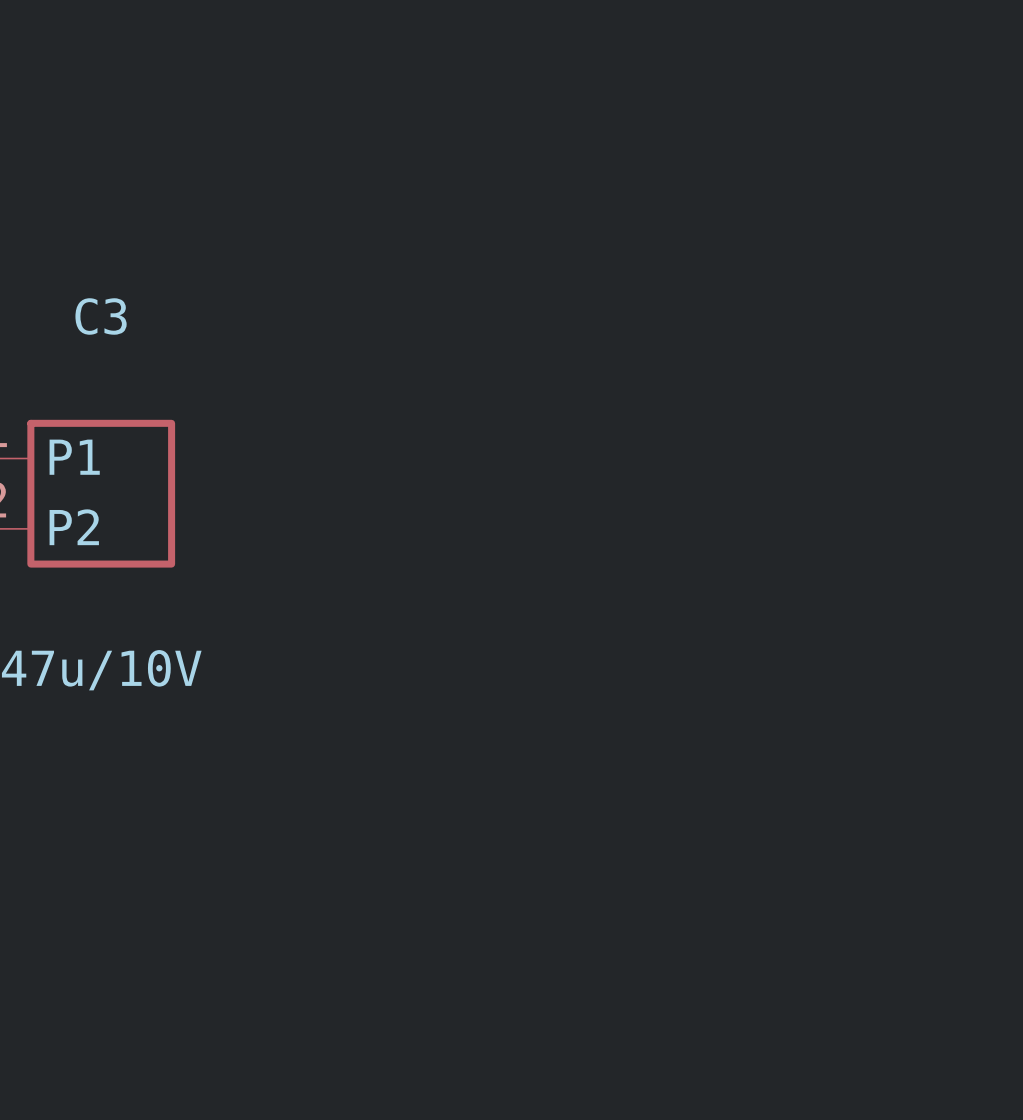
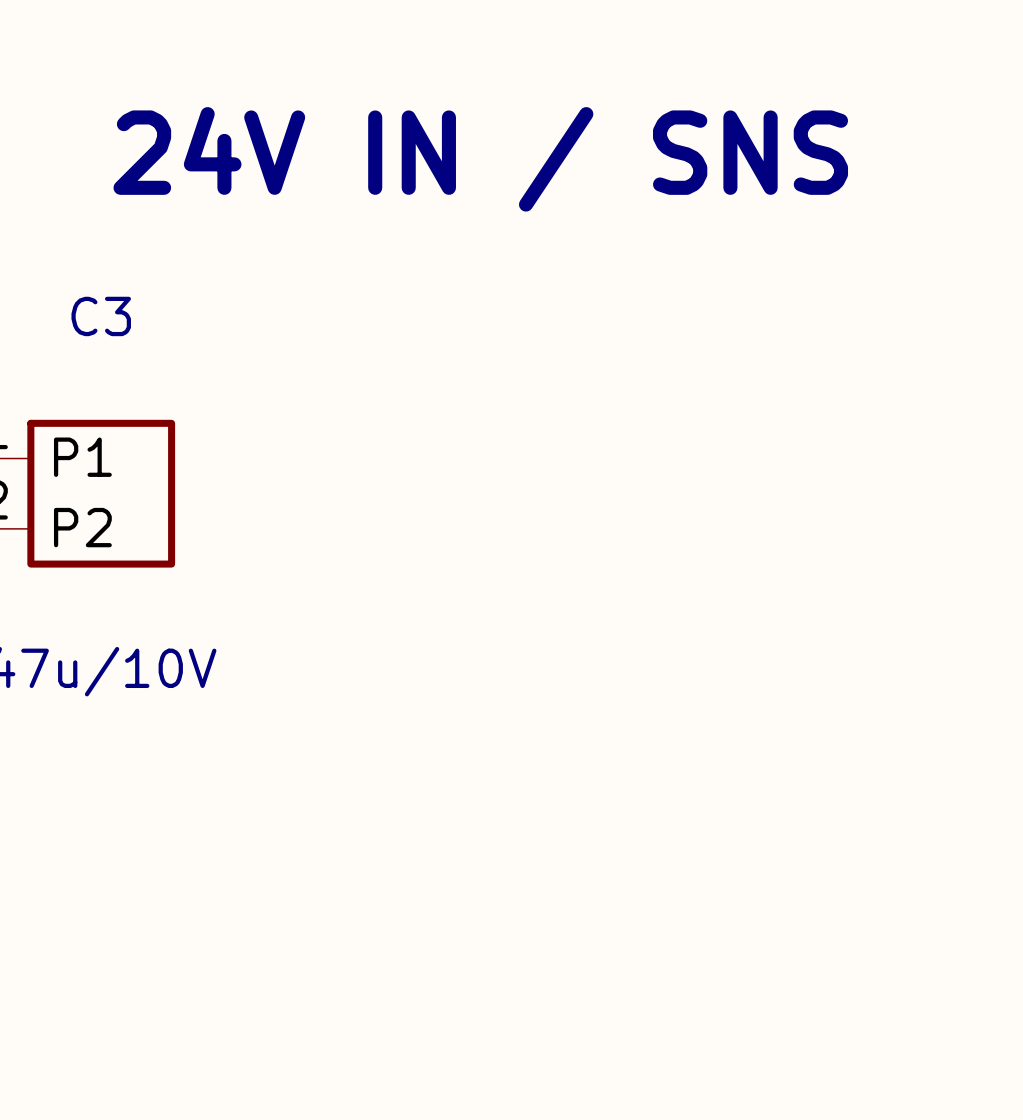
text: none -> 24V IN / SNS (480, 159)

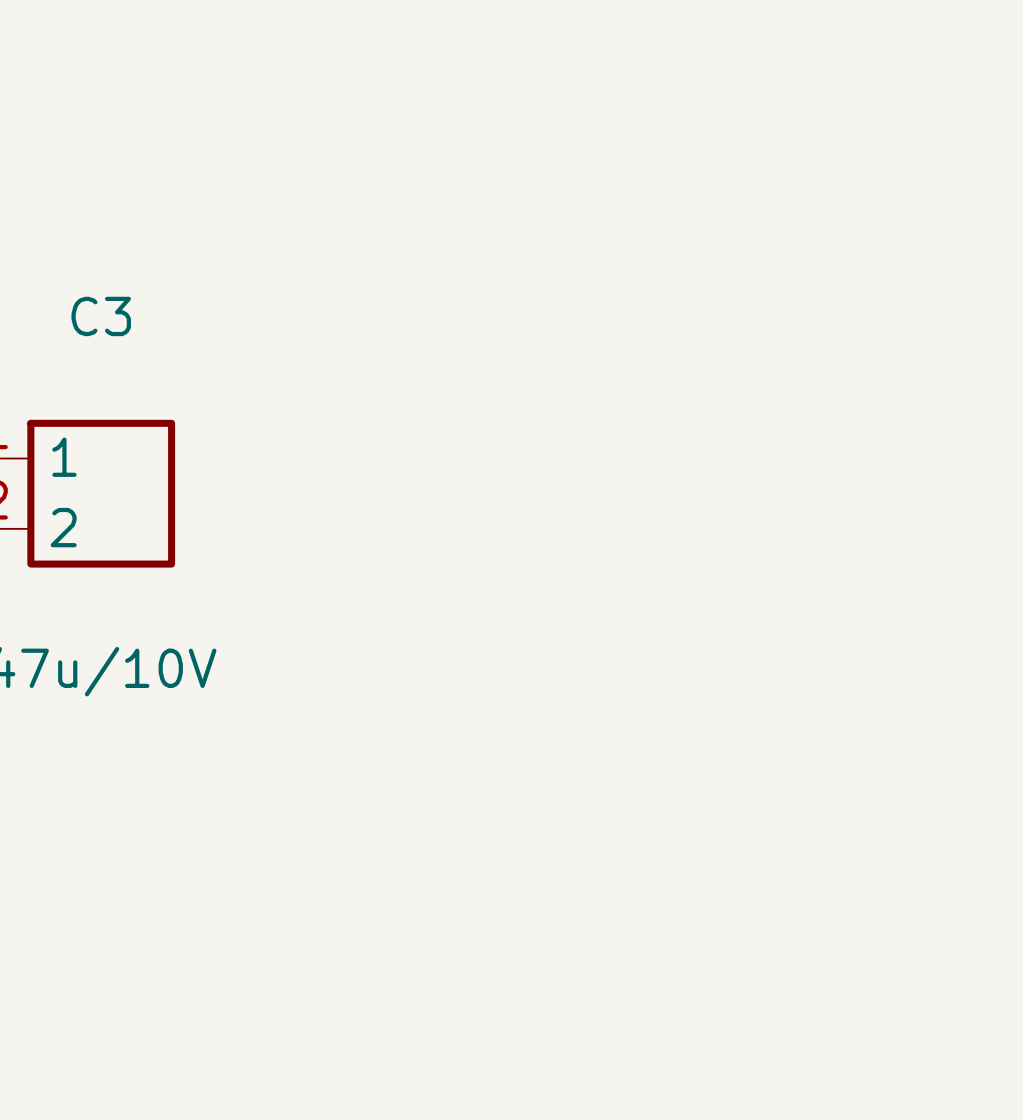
text: 24V IN / SNS (480, 159) -> none
C3 pin name: P1 (82, 457) -> 1 (64, 457)
C3 pin name: P2 (82, 527) -> 2 (63, 527)

